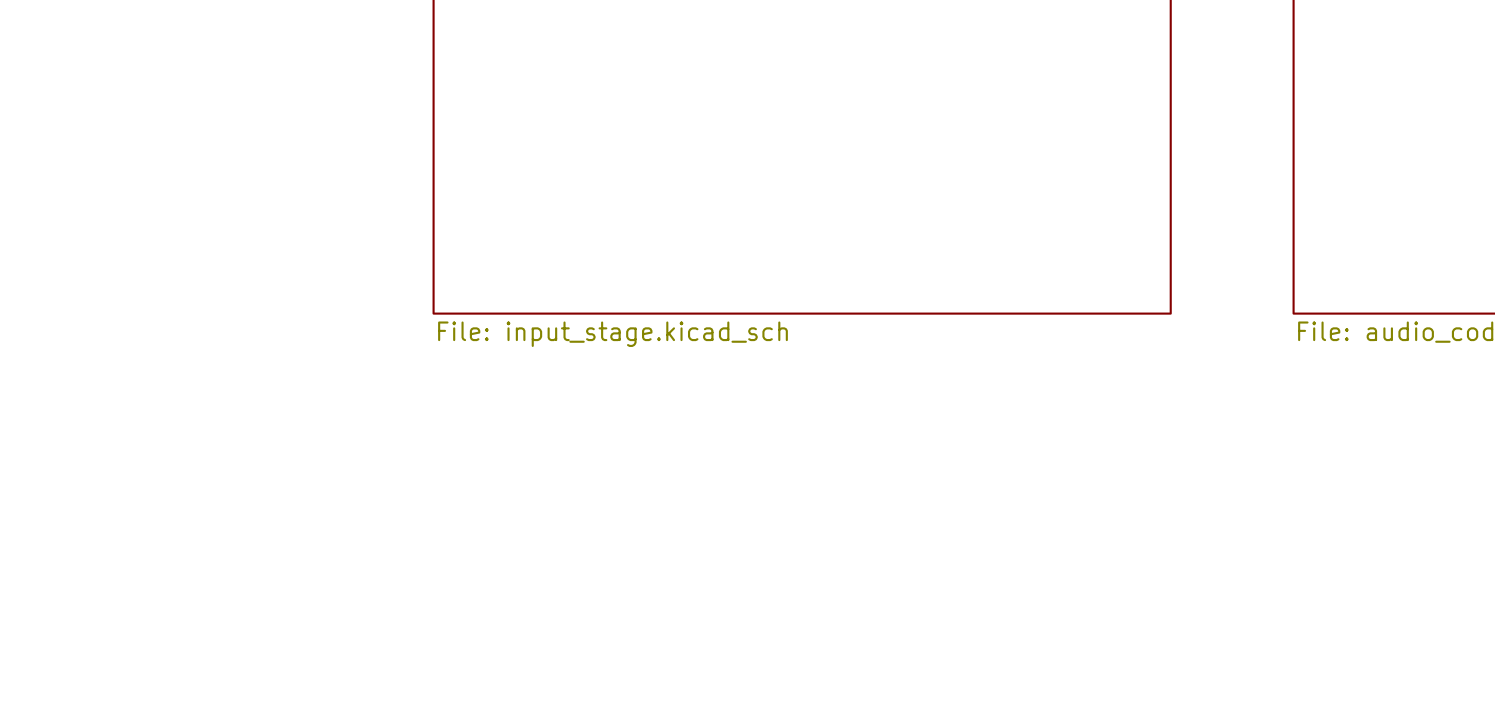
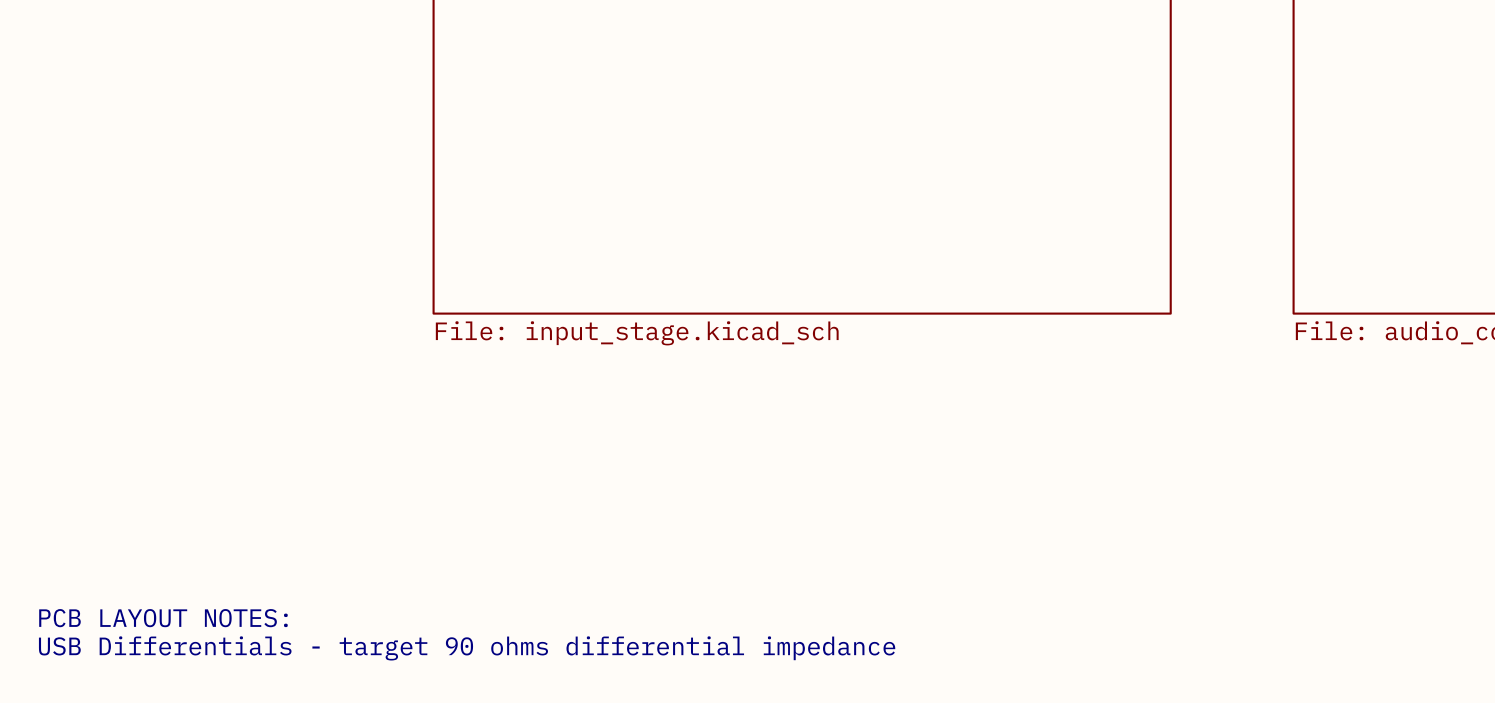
text: none -> PCB LAYOUT NOTES: (163, 618)
text: none -> USB Differentials - target 90 ohms differential impedance (467, 648)

